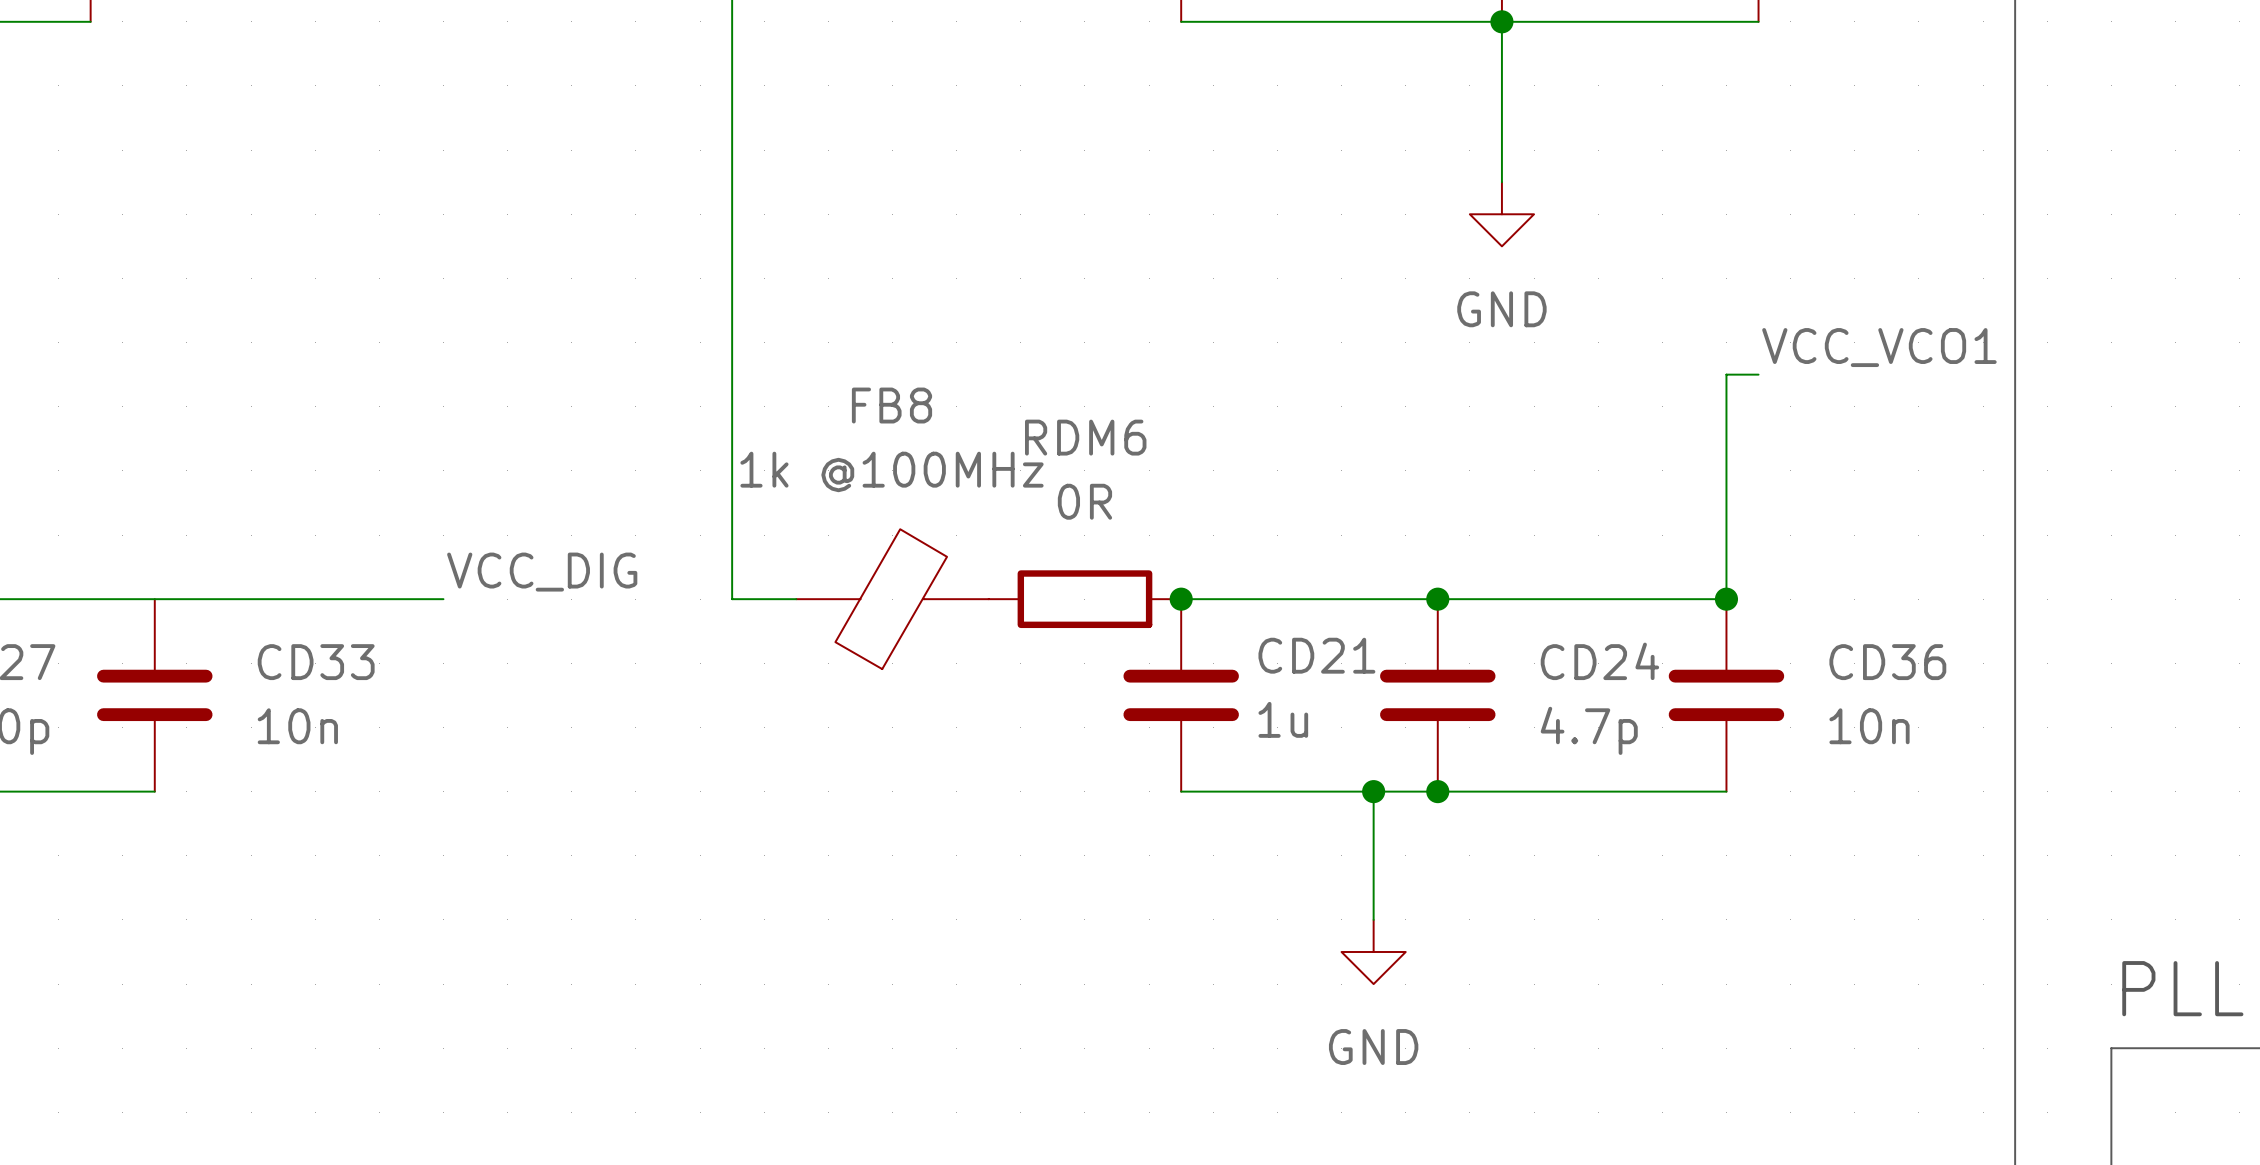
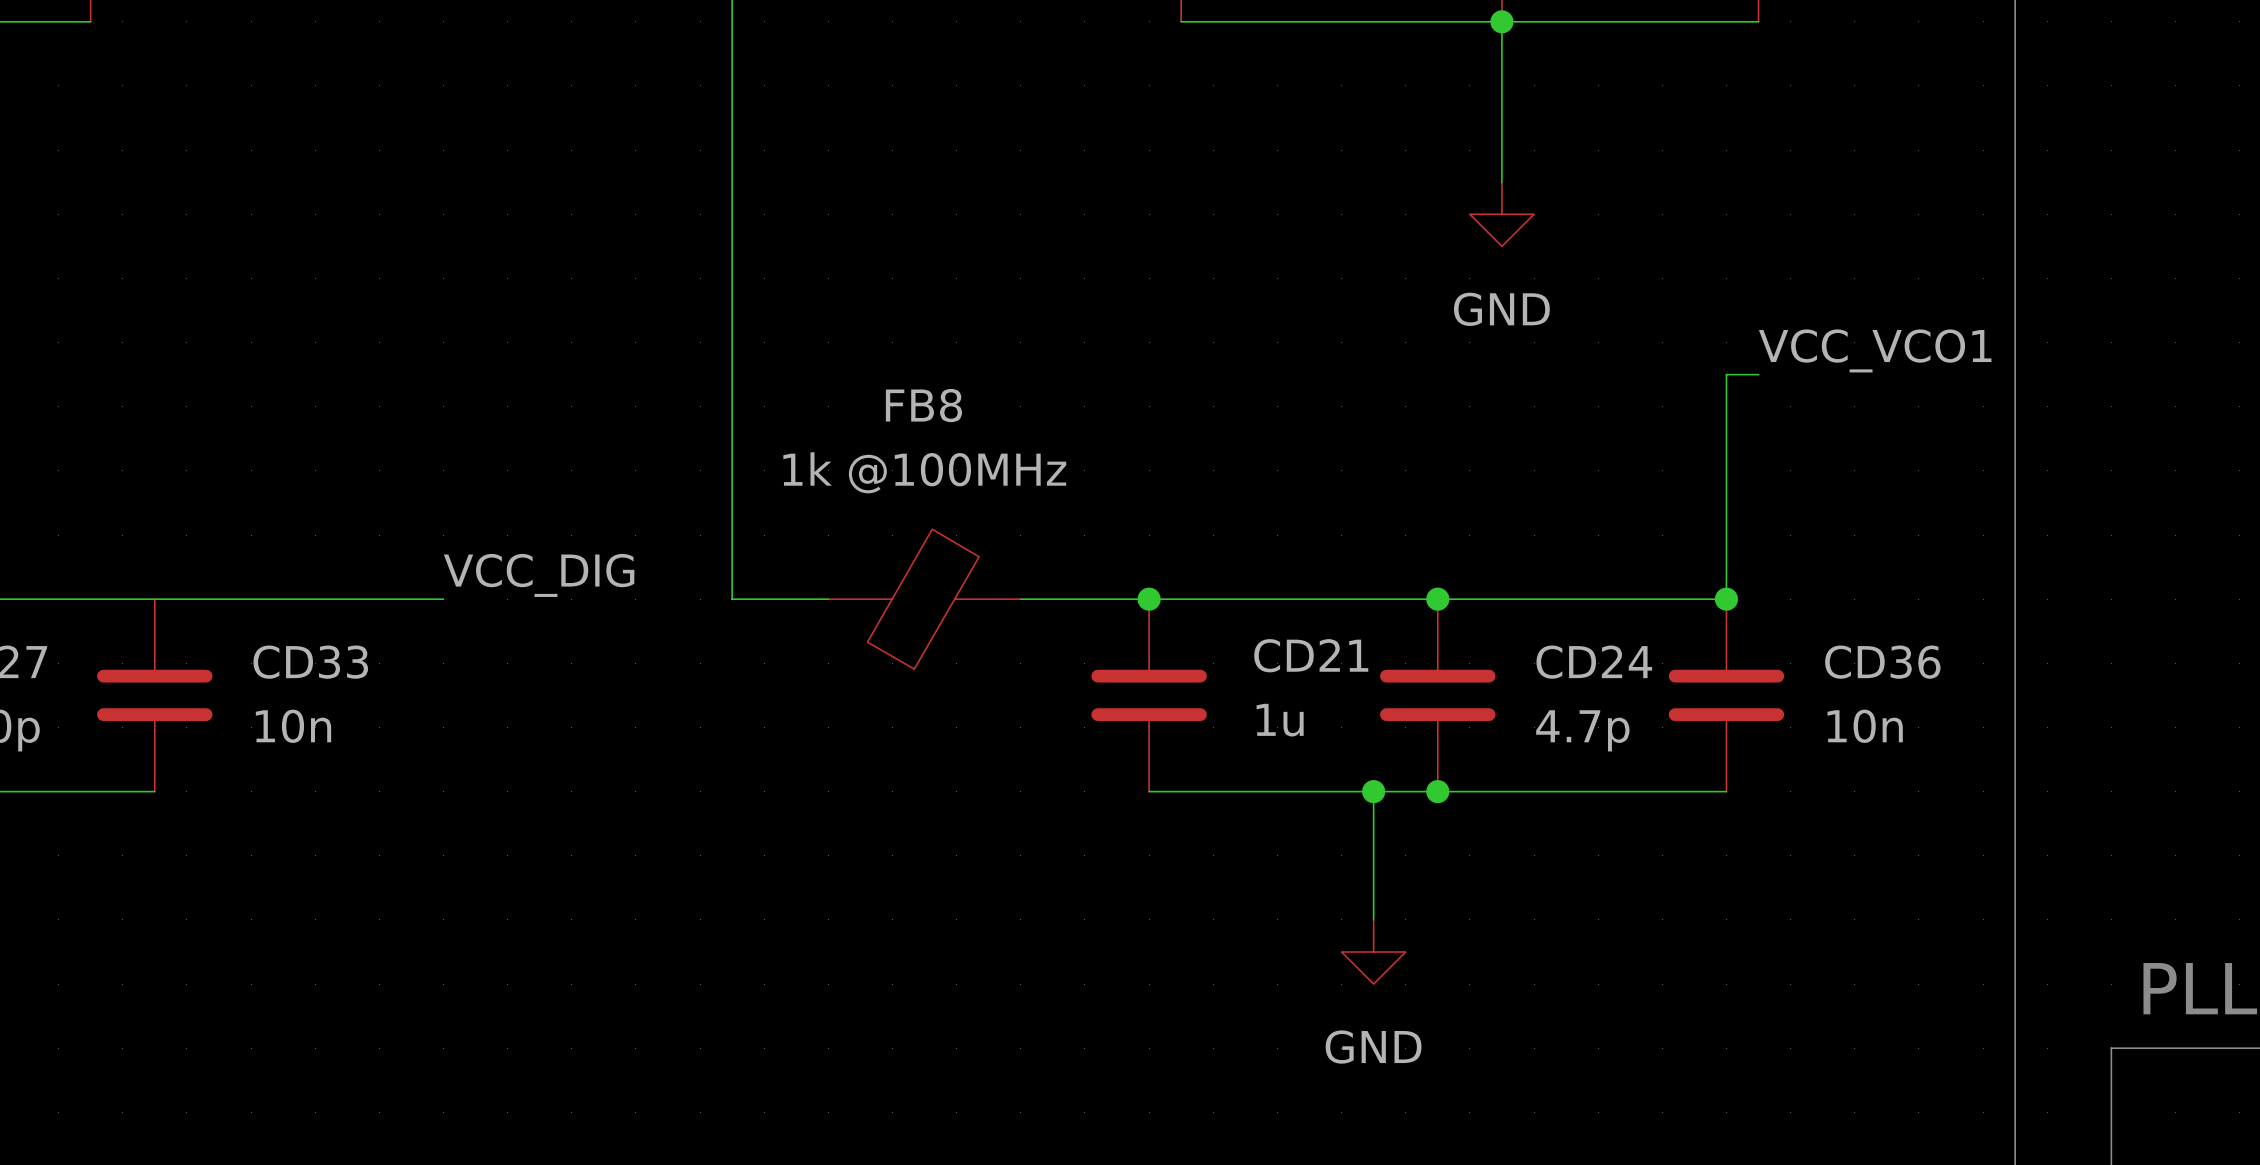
FB8 position: (892, 599) -> (924, 599)
wire: none -> (1020, 599) (1181, 599)
RDM6: 0R (1084, 599) -> none
junction position: (1181, 599) -> (1149, 599)
CD21 position: (1181, 695) -> (1149, 695)
wire: none -> (1149, 791) (1181, 791)

